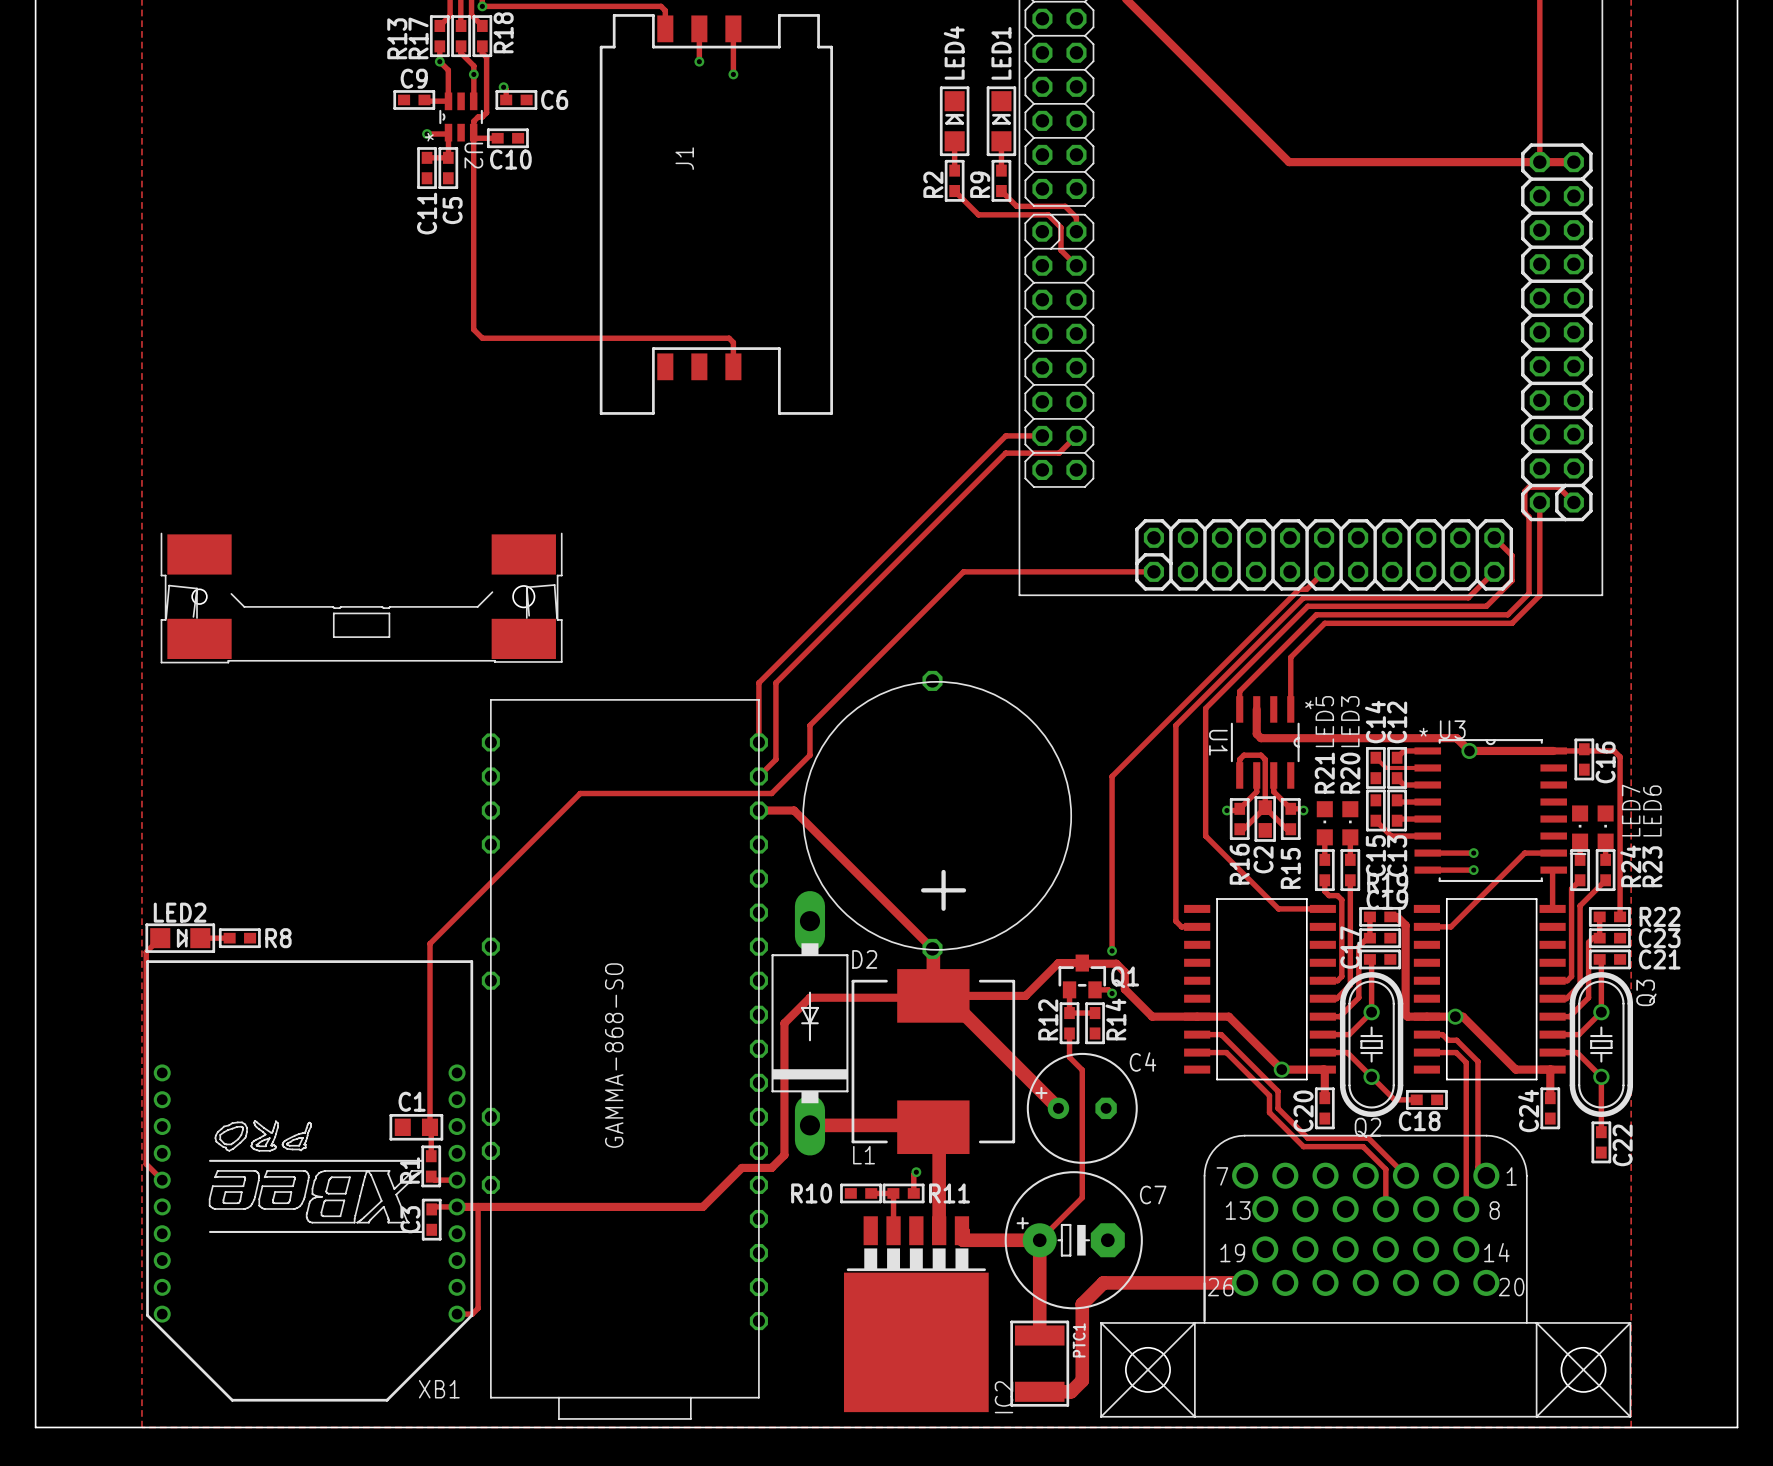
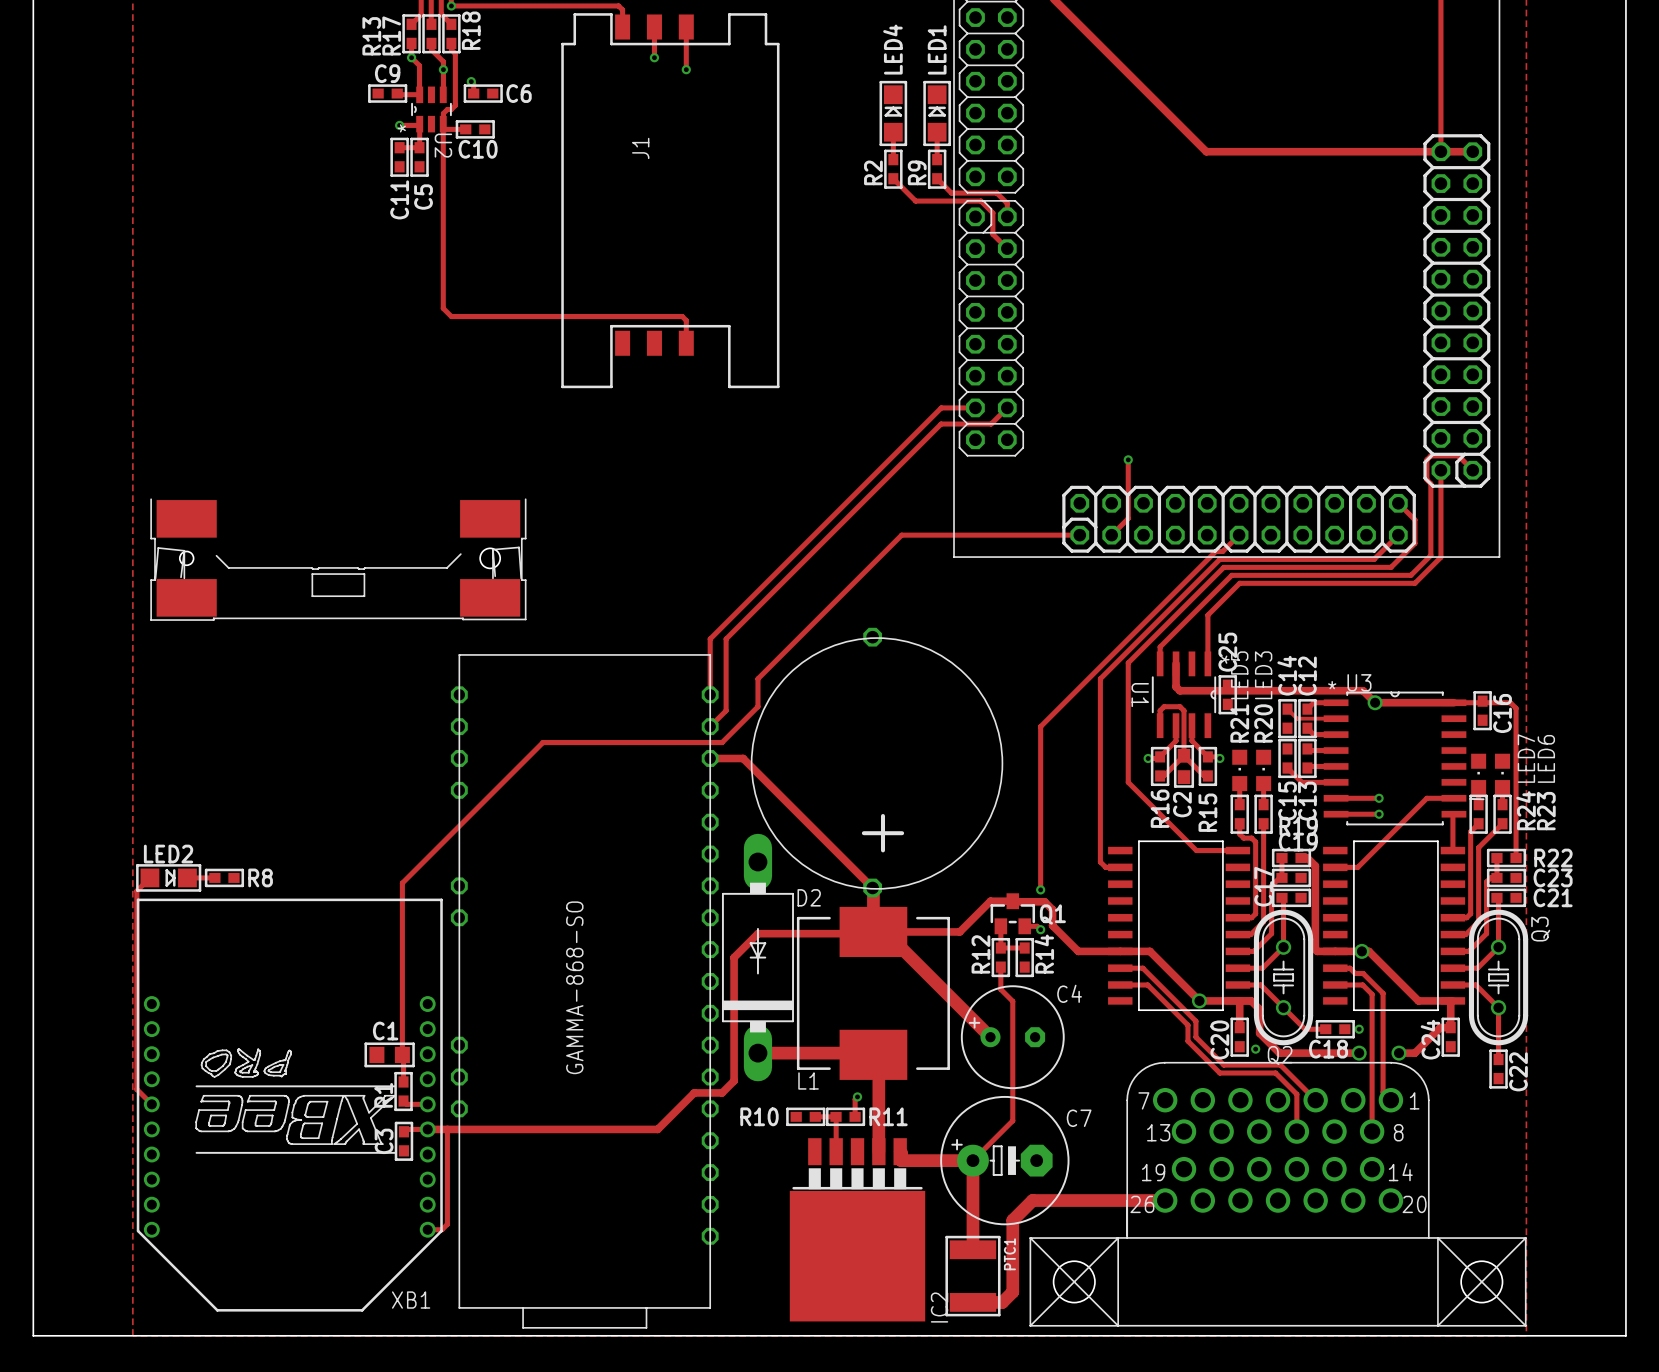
track: none -> (1128, 459) (1128, 518) (1111, 535)
via: none -> (1128, 459)
C25: none -> (1227, 694)
track: none -> (1239, 1000) (1251, 1000) (1259, 1009) (1259, 1033) (1279, 1053) (1359, 1053)
track: none -> (1450, 1027) (1440, 1027) (1414, 1053) (1399, 1053)
via: none -> (1359, 1029)
via: none -> (1255, 1049)
via: none -> (1359, 1053)
via: none -> (1399, 1053)

